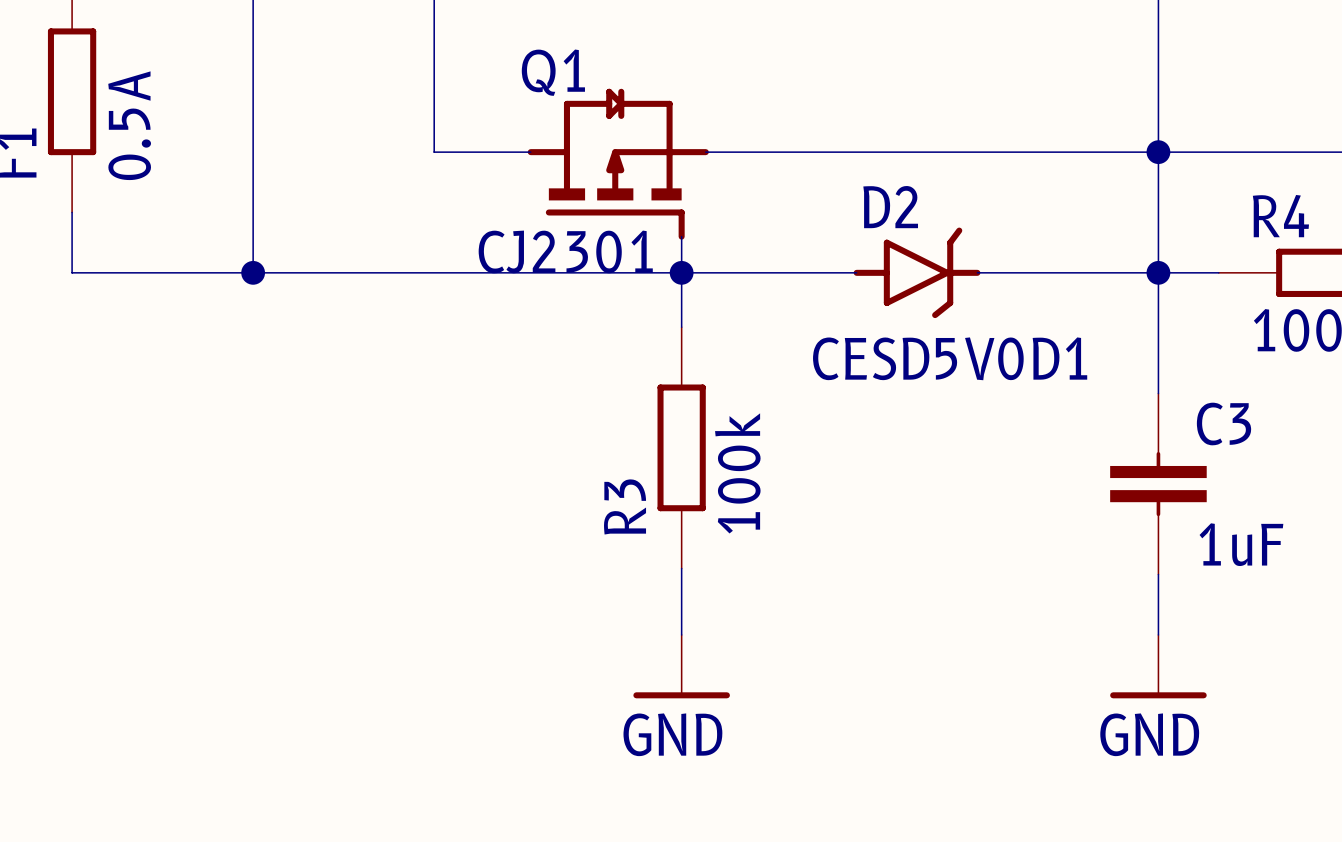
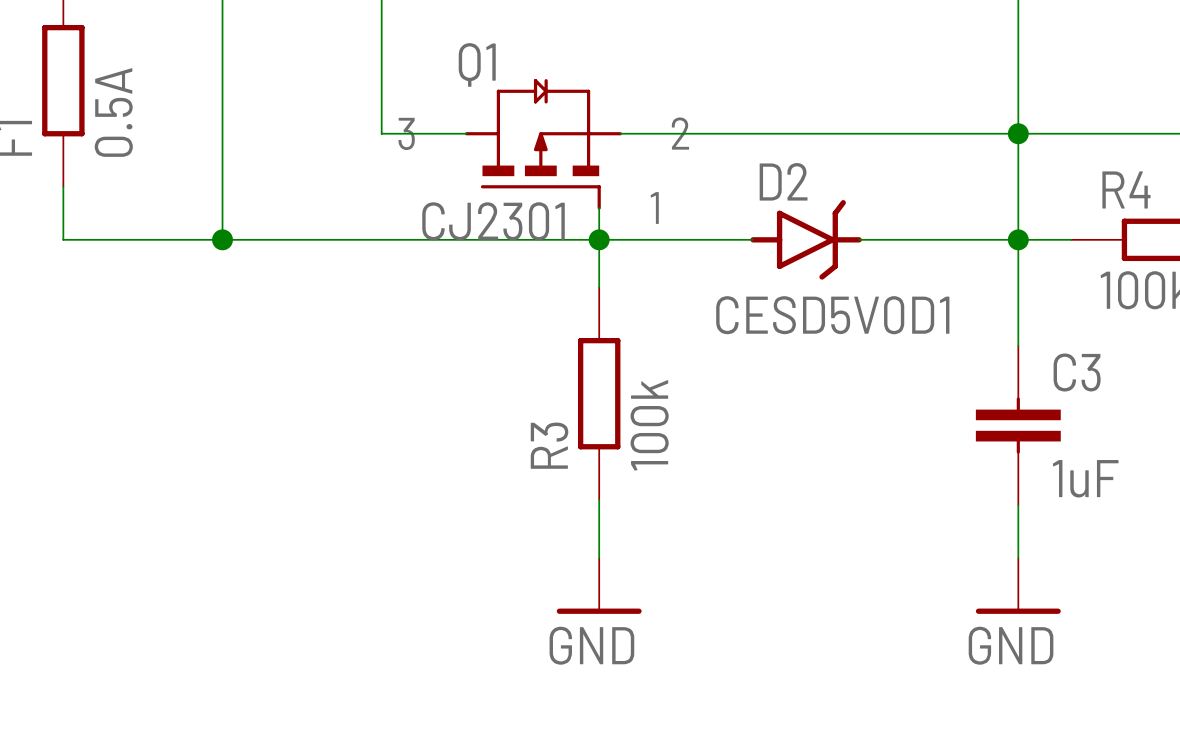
Q1 symbol: [527, 88, 709, 240] -> [464, 79, 623, 210]

